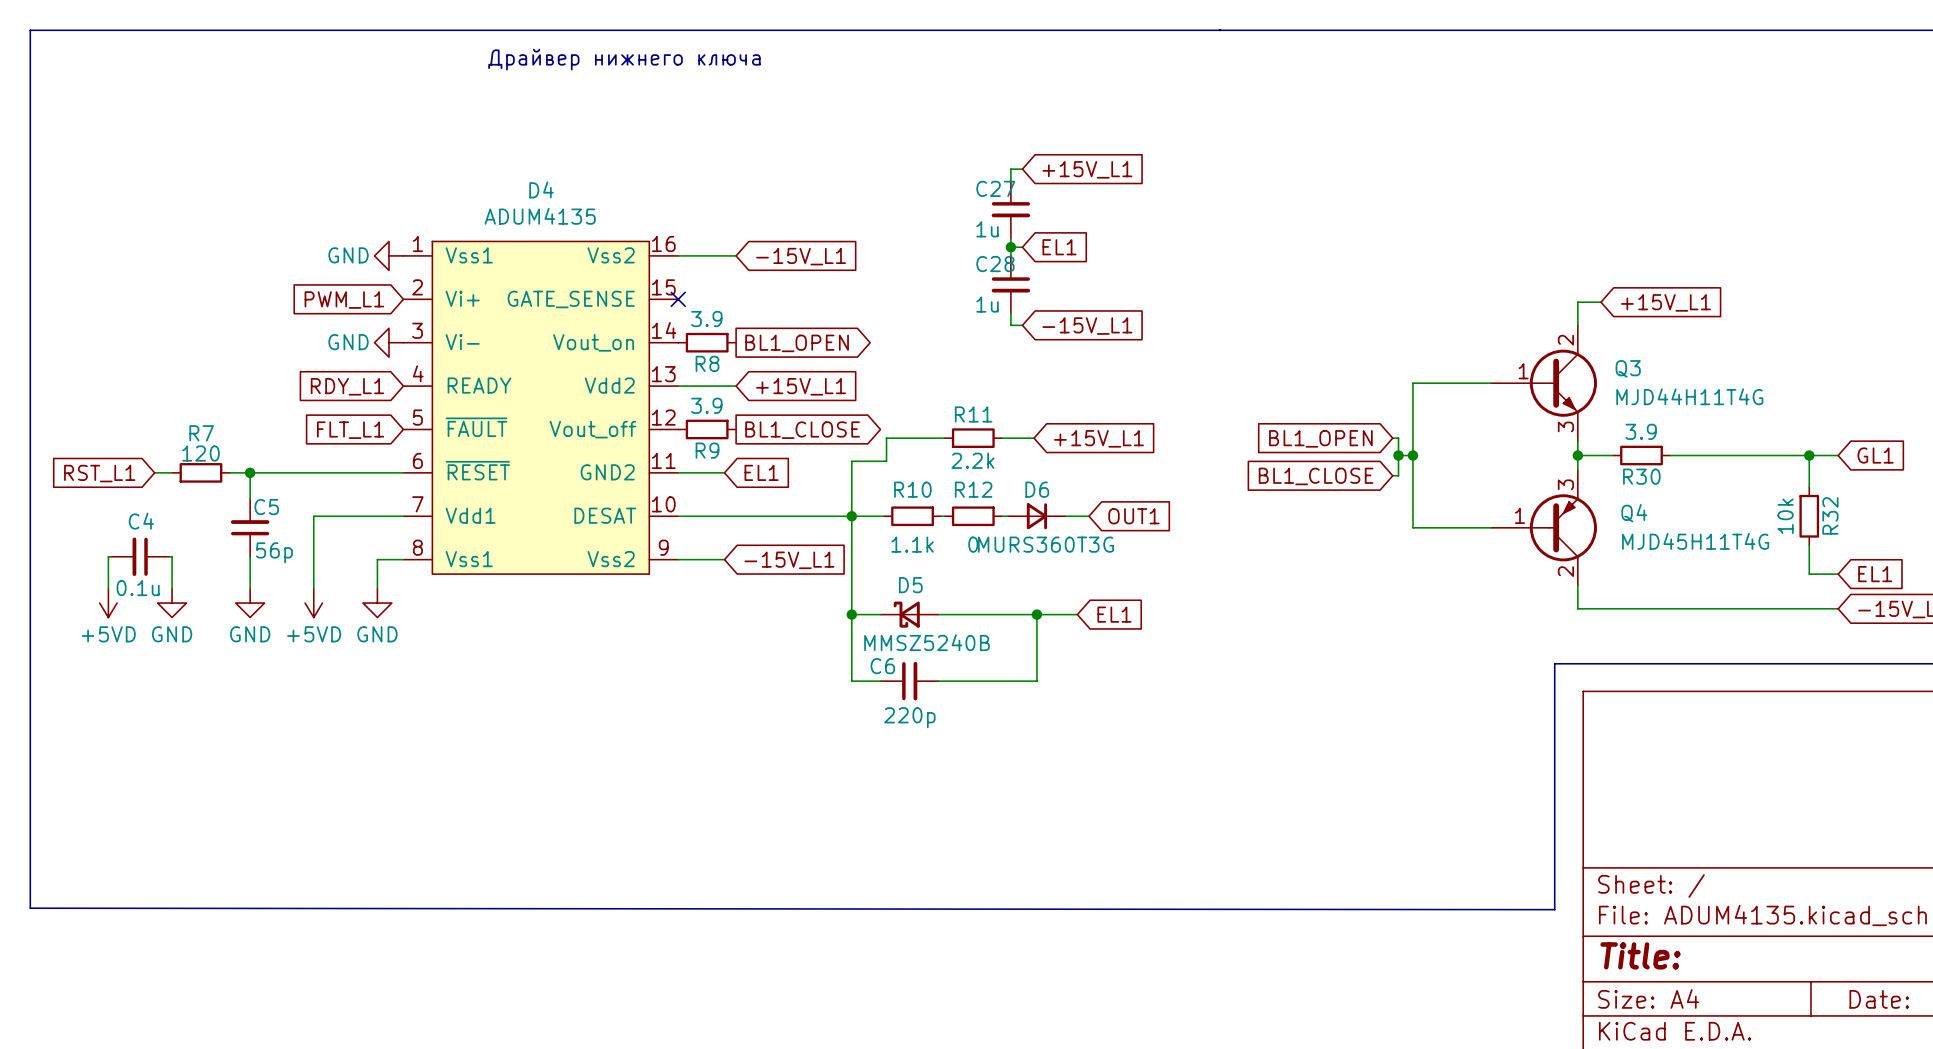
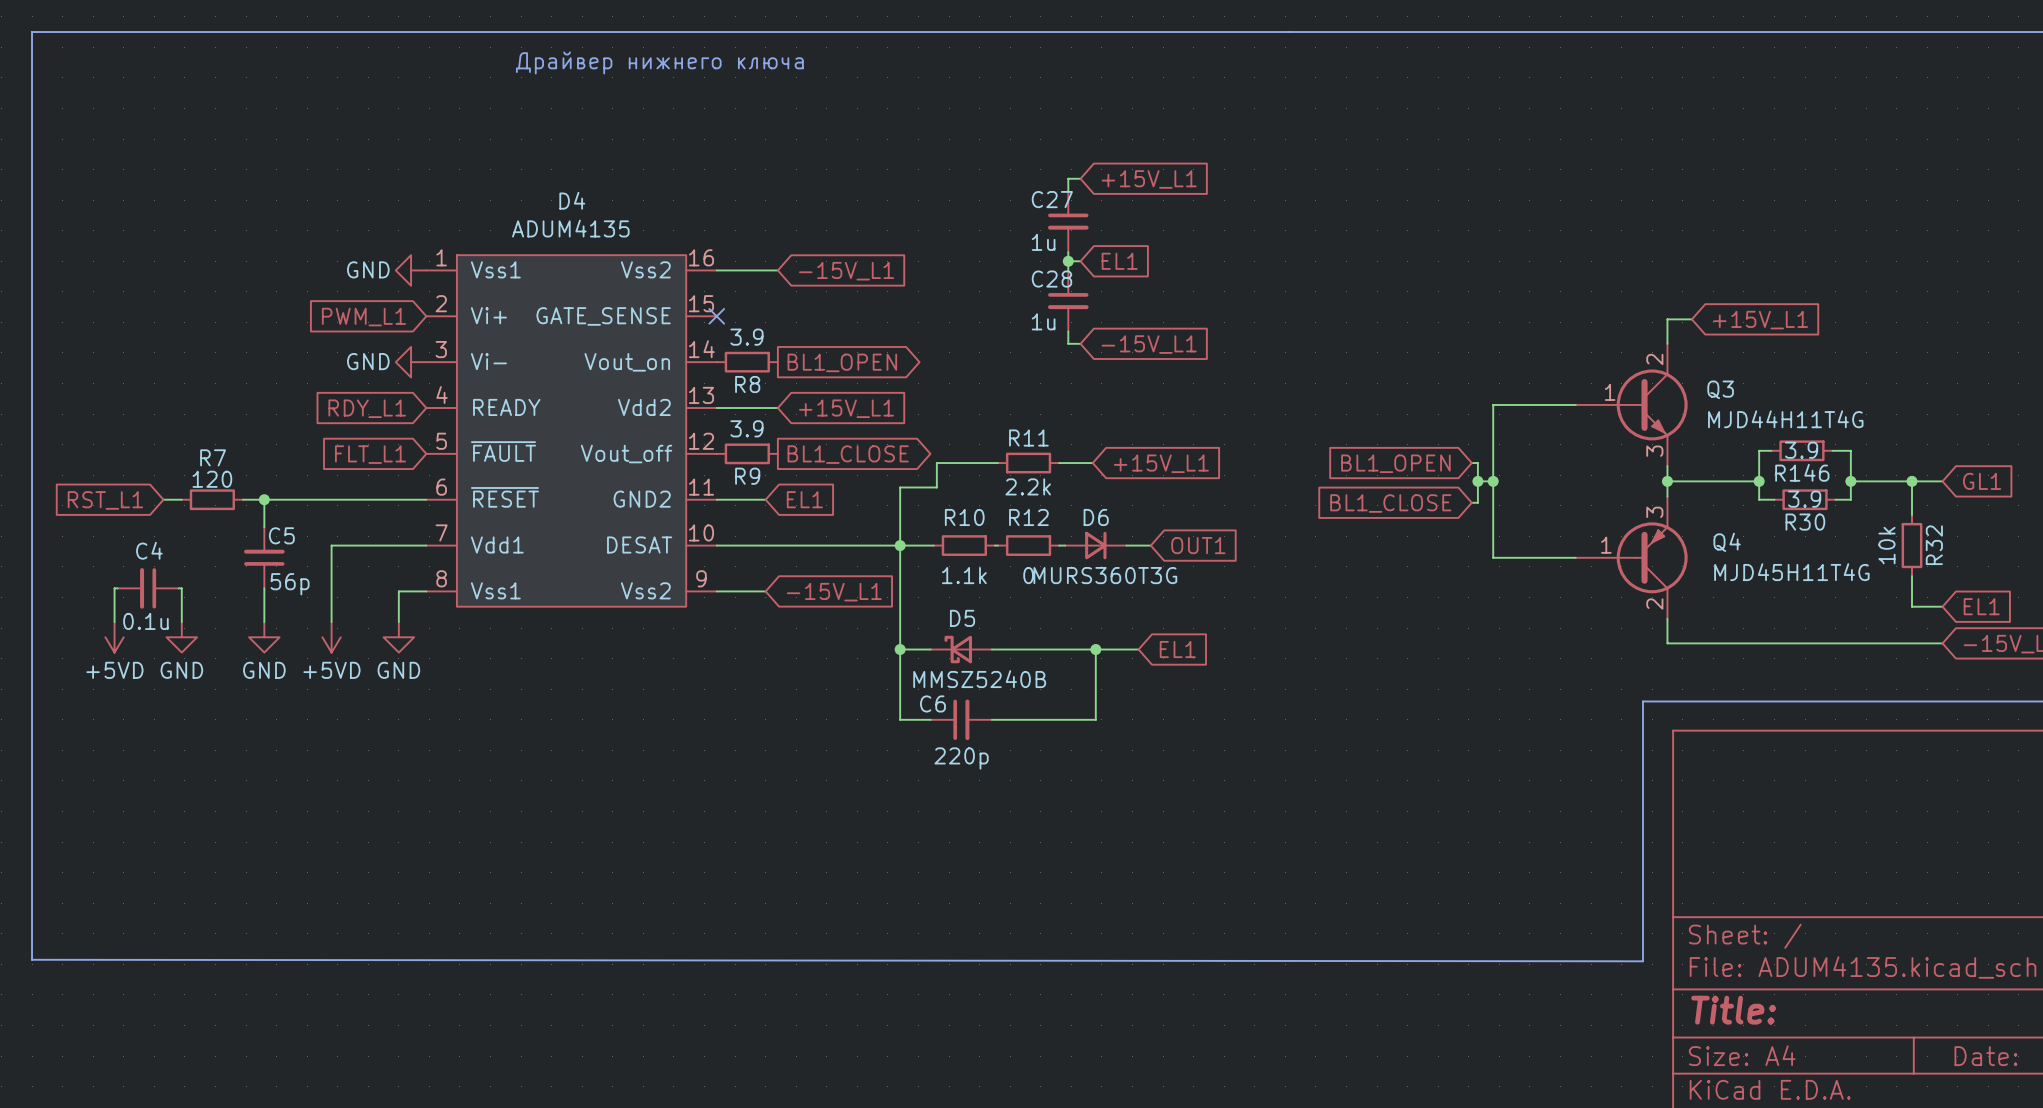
wire: none -> (1771, 450) (1759, 450) (1759, 499) (1774, 499)
R146: none -> 3.9 (1801, 450)
wire: none -> (1832, 450) (1850, 450) (1850, 499) (1835, 499)
R30 value position: 3.9 (1641, 431) -> 3.9 (1804, 499)
wire: none -> (1704, 481) (1759, 481)
R30 position: (1641, 455) -> (1805, 499)
junction: none -> (1759, 481)
wire: (1670, 455) (1751, 455) -> none
junction: none -> (1850, 481)

